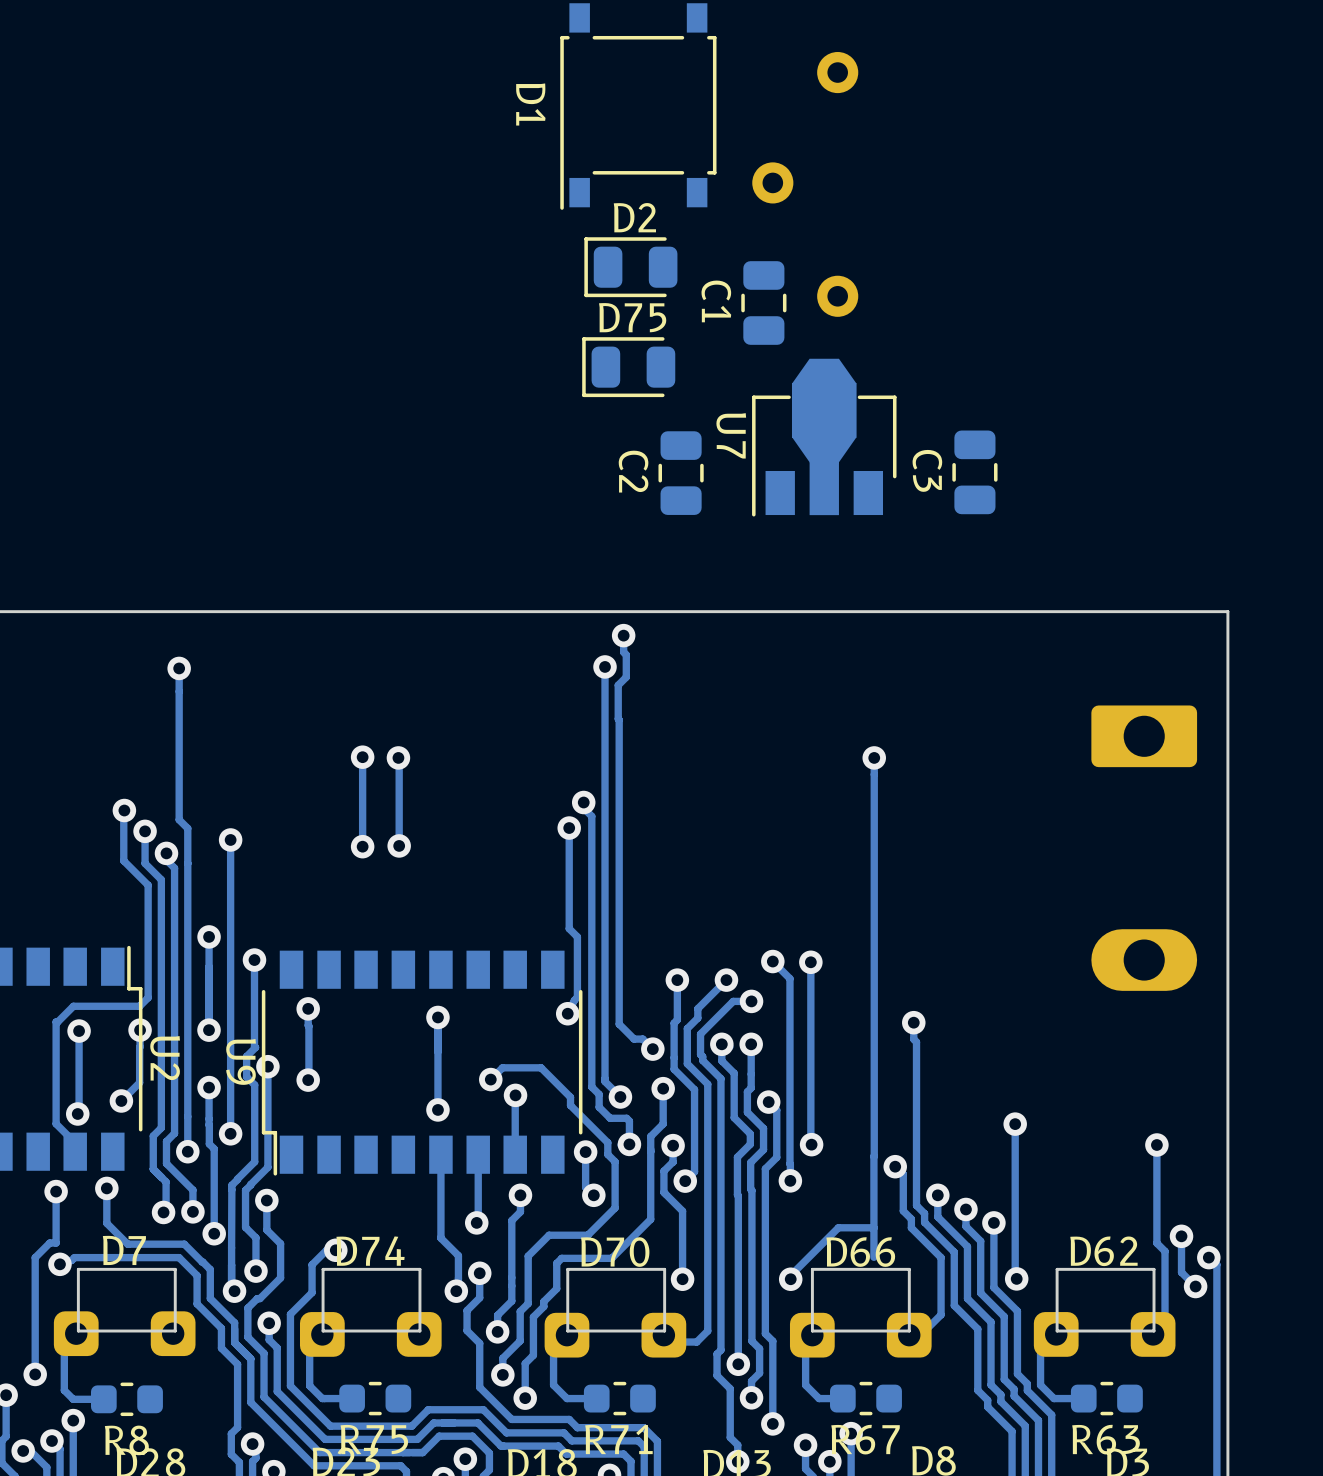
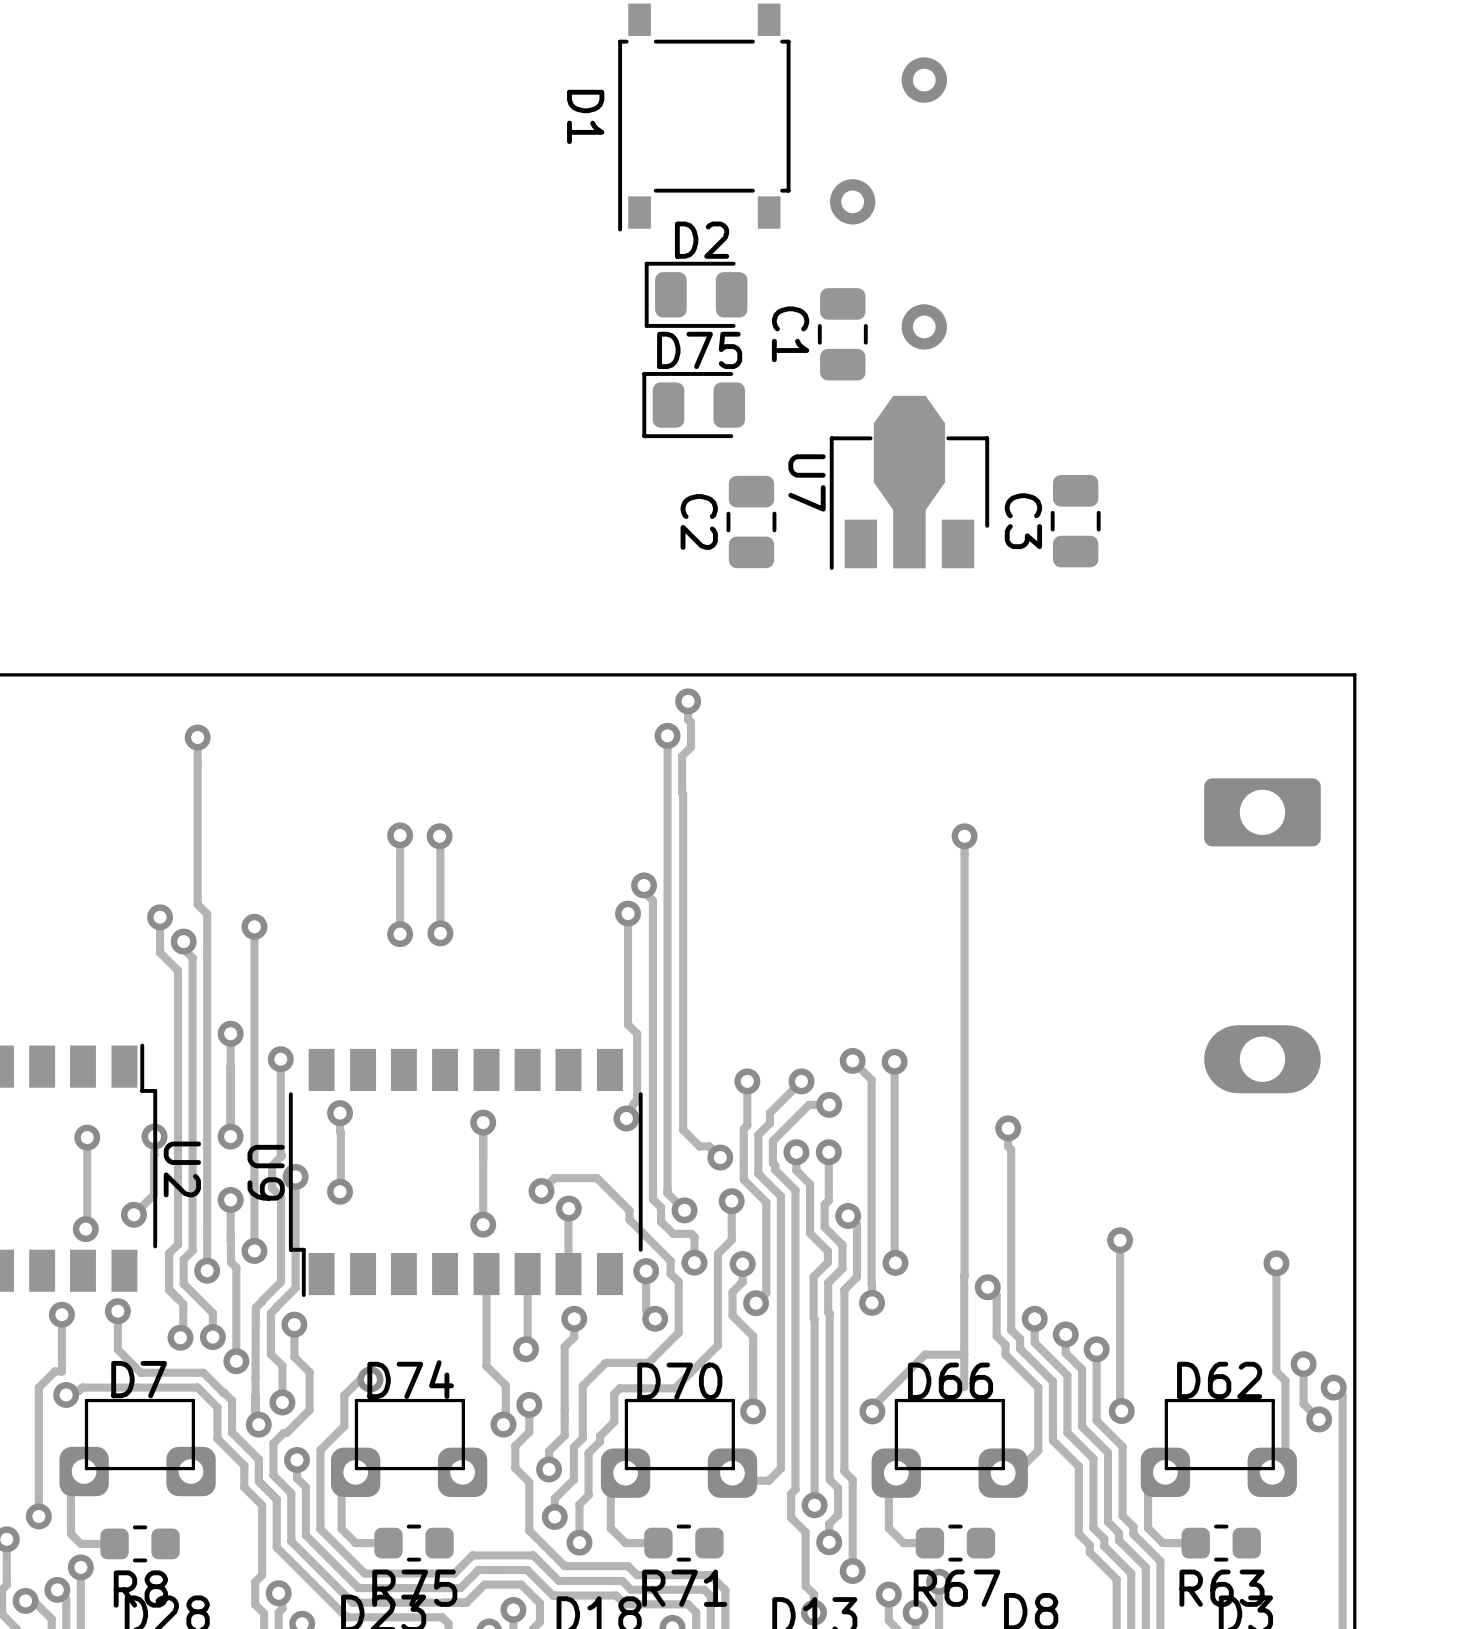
track: (124, 810) (123, 860) (148, 885) (148, 997) (139, 1006) (73, 1006) (56, 1021) (56, 1123) (75, 1142) (75, 1151) -> none
via: (124, 810) -> none

